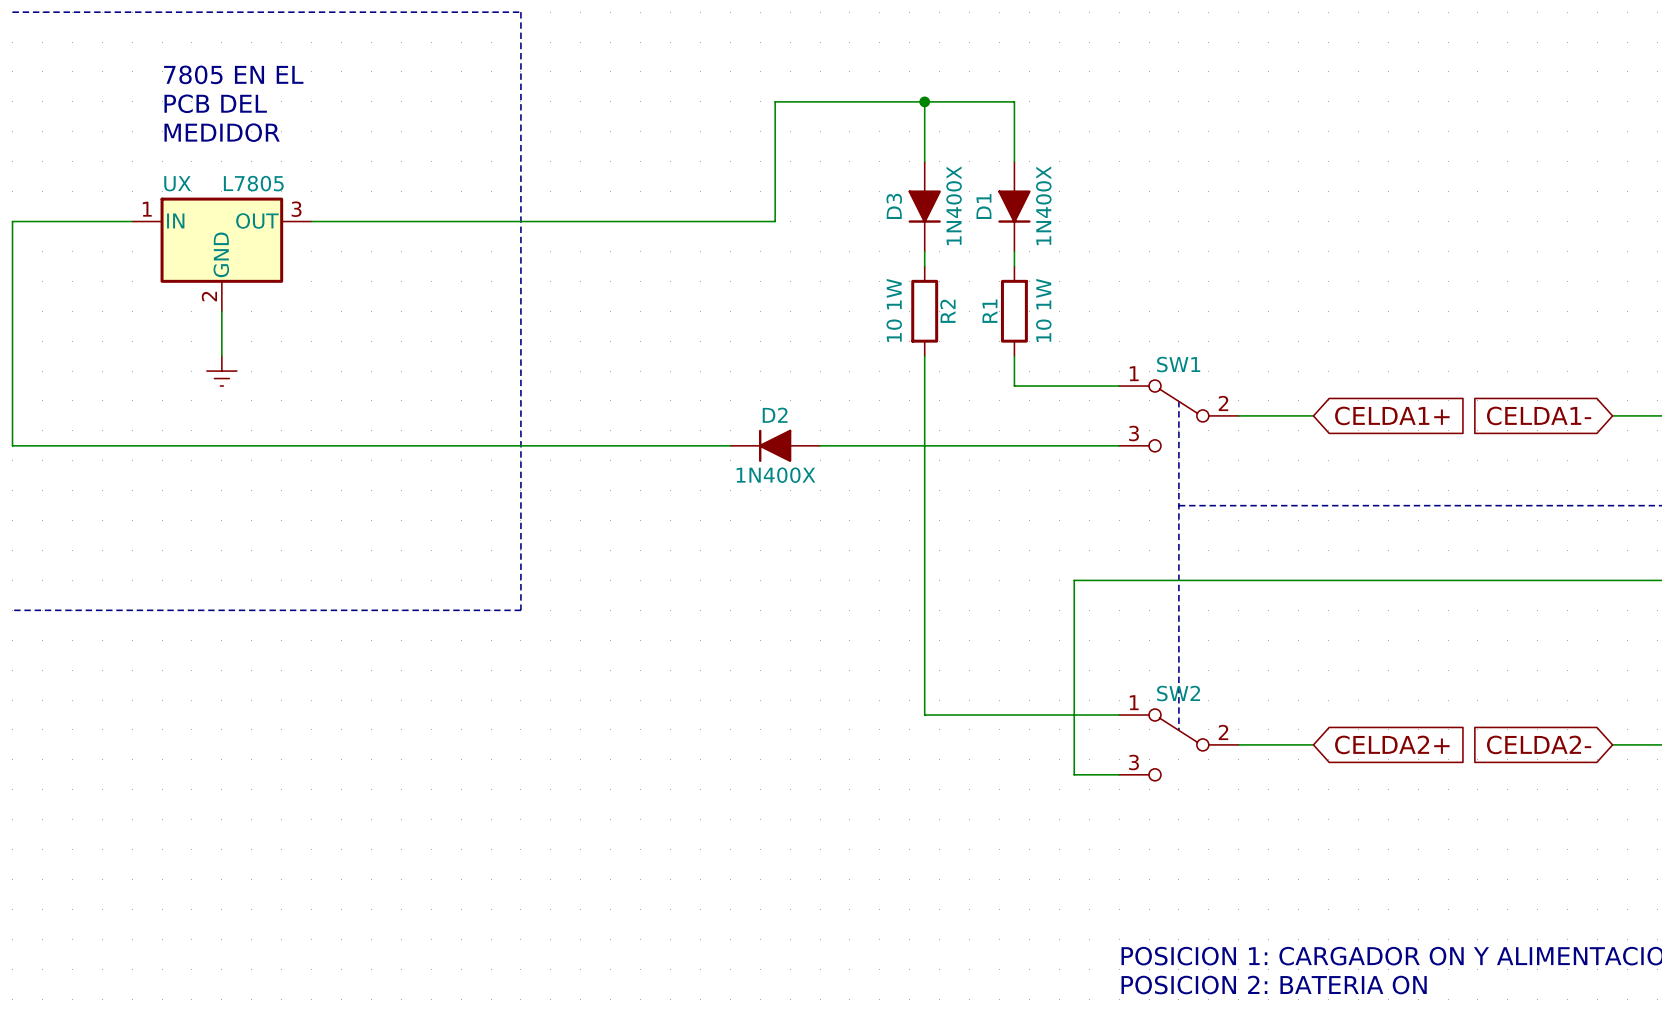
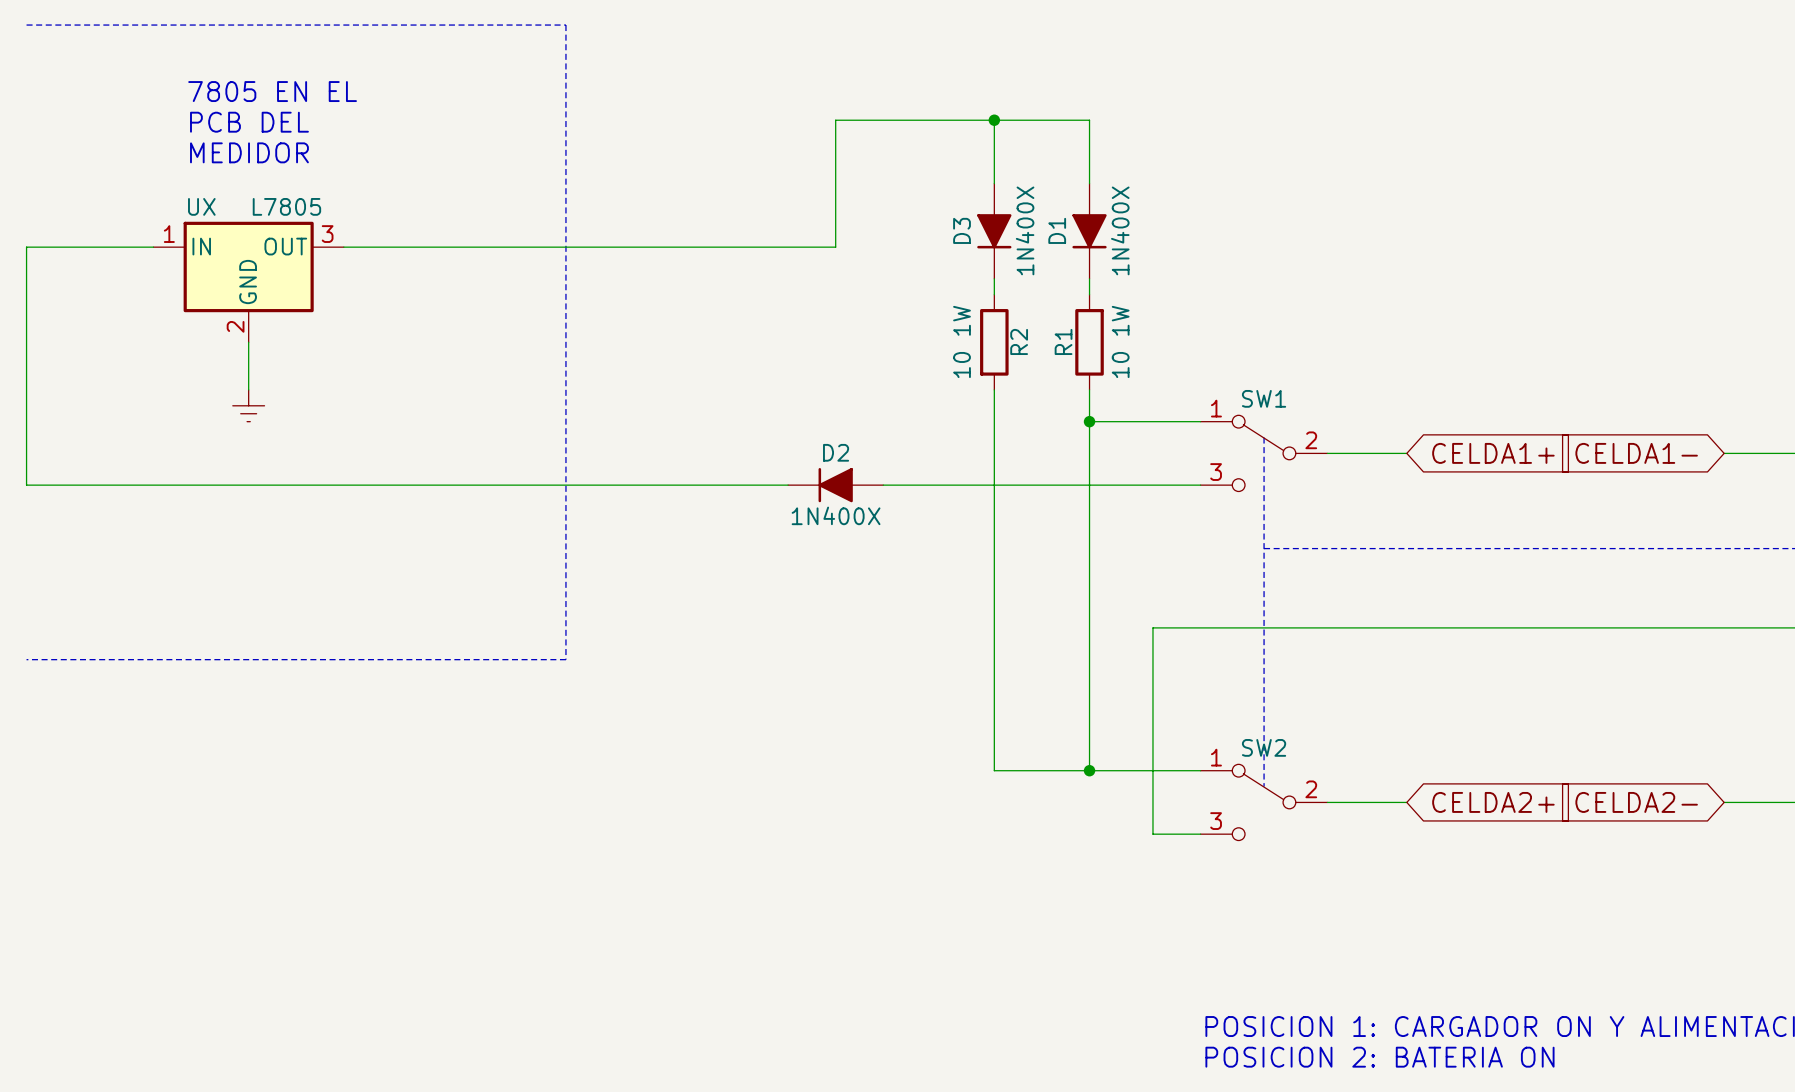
wire: none -> (1089, 421) (1089, 770)
junction: none -> (1089, 421)
junction: none -> (1089, 770)

